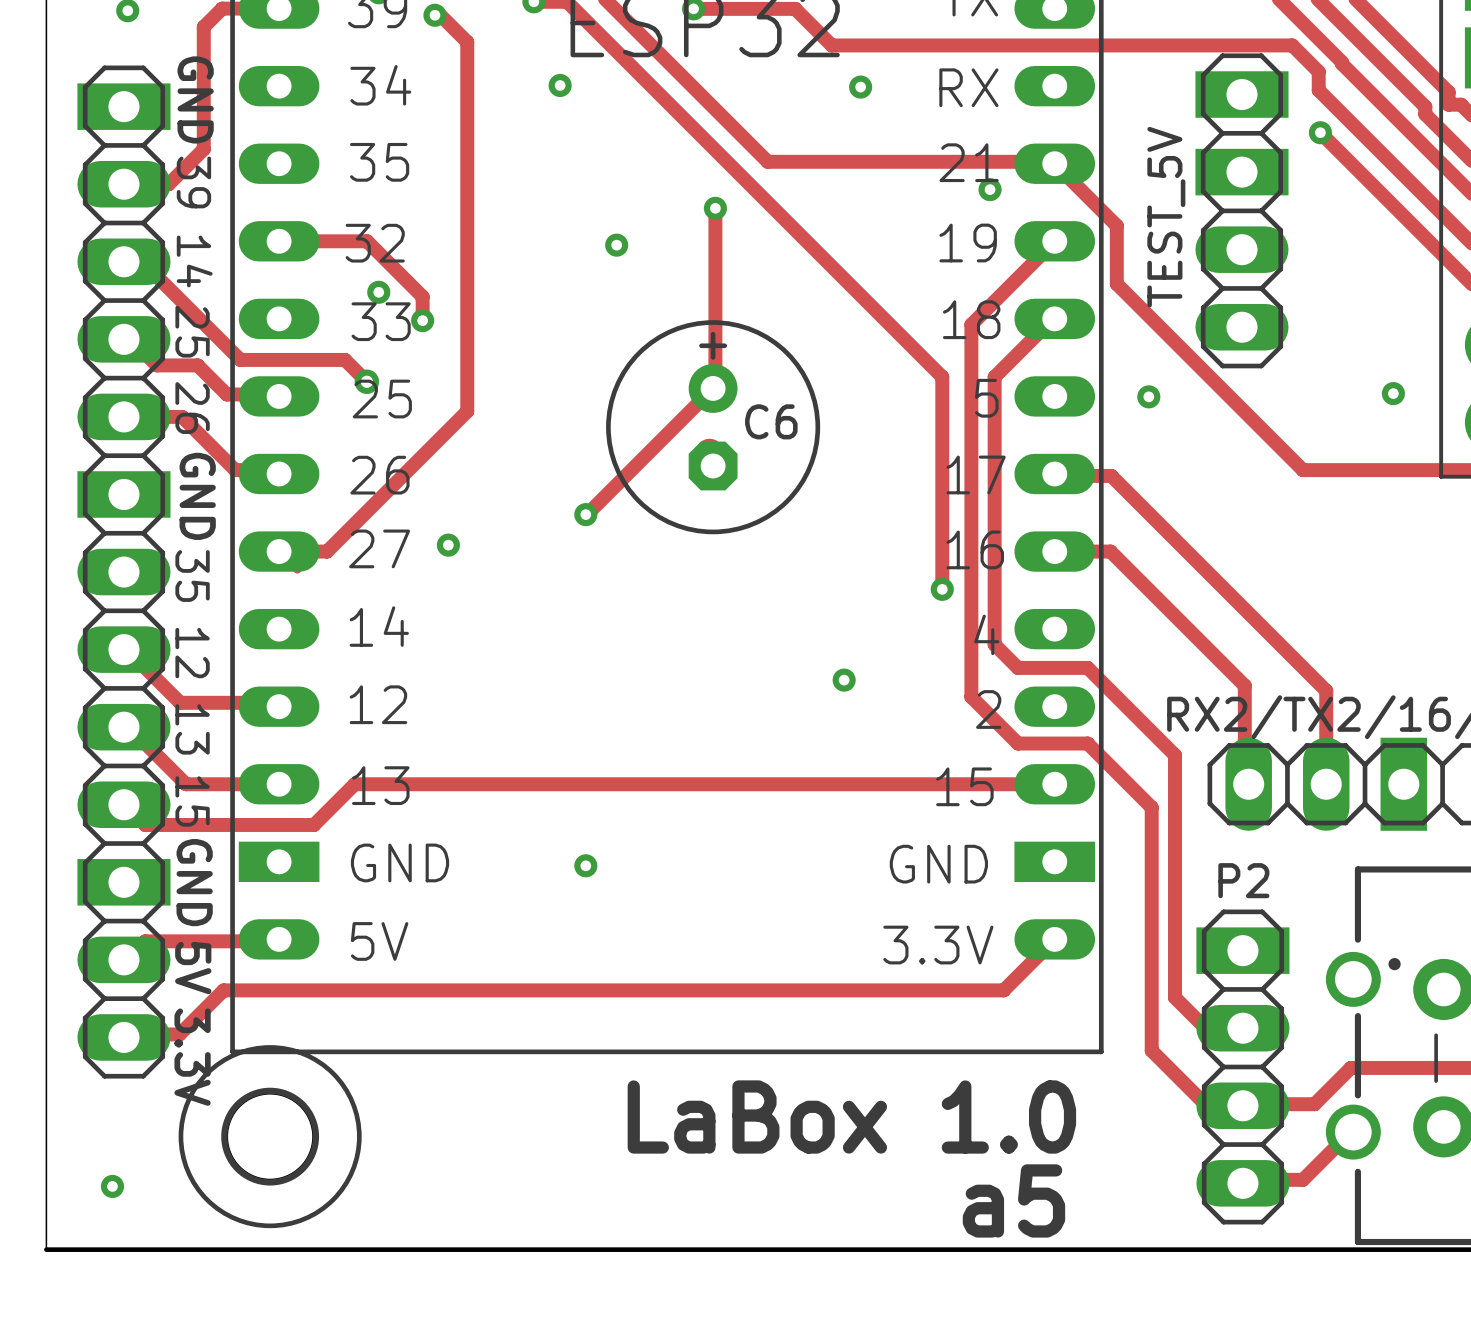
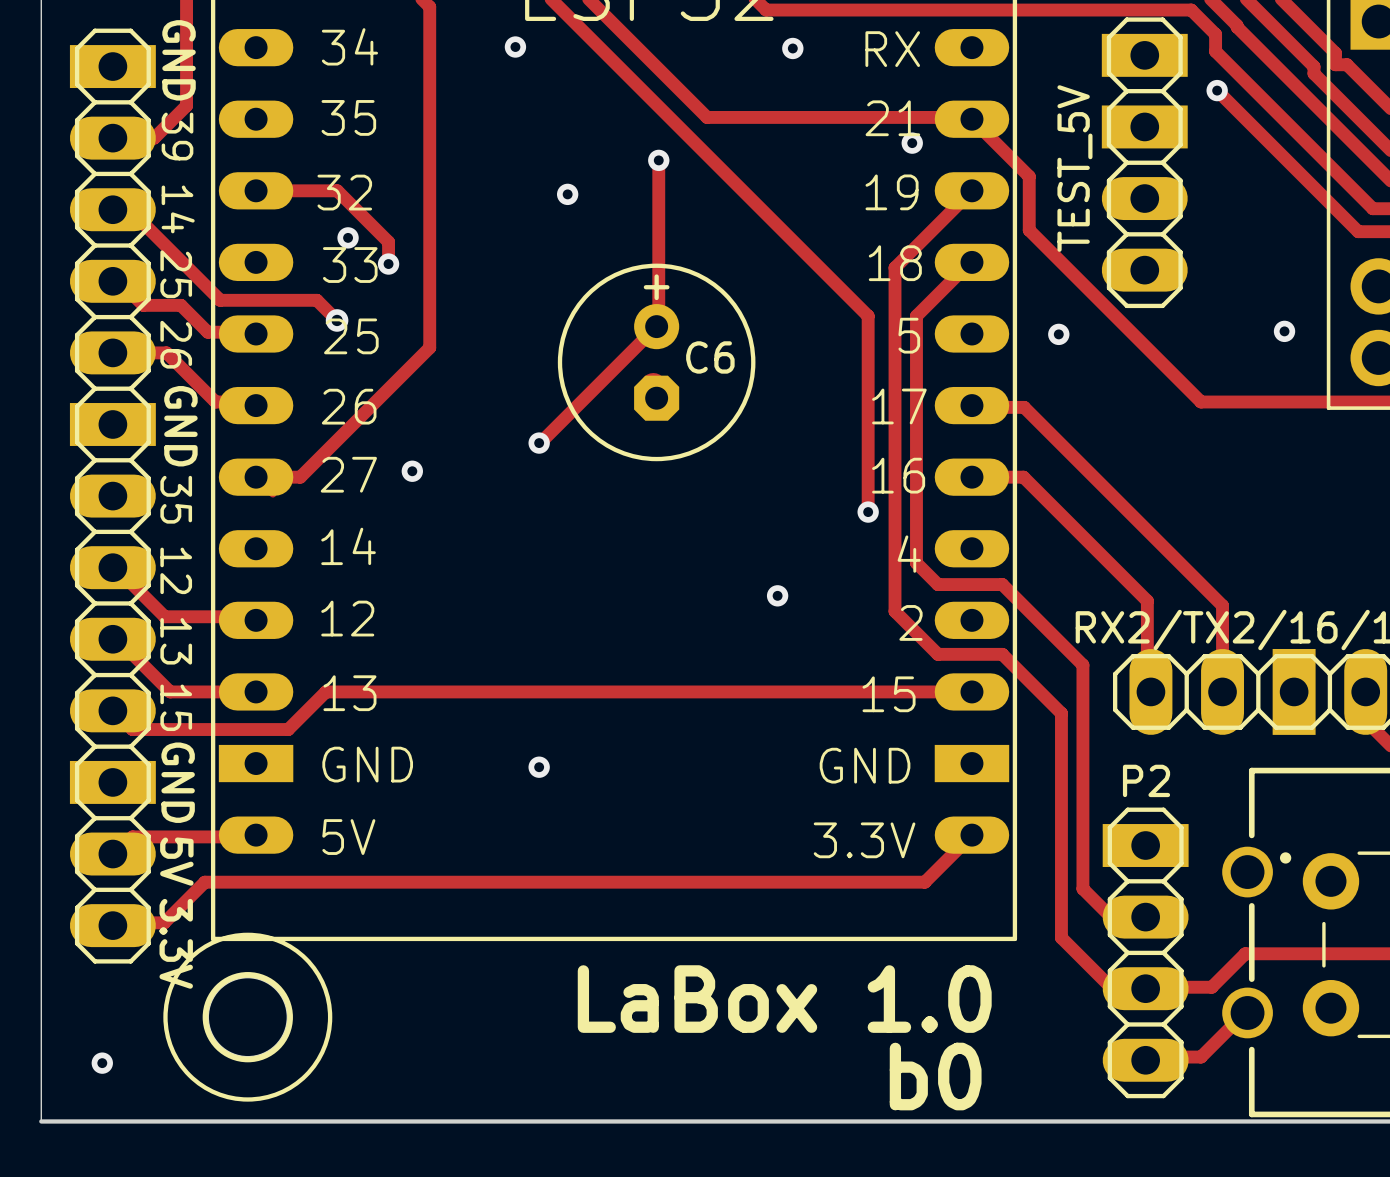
text: a5 (1013, 1200) -> b0 (935, 1076)

